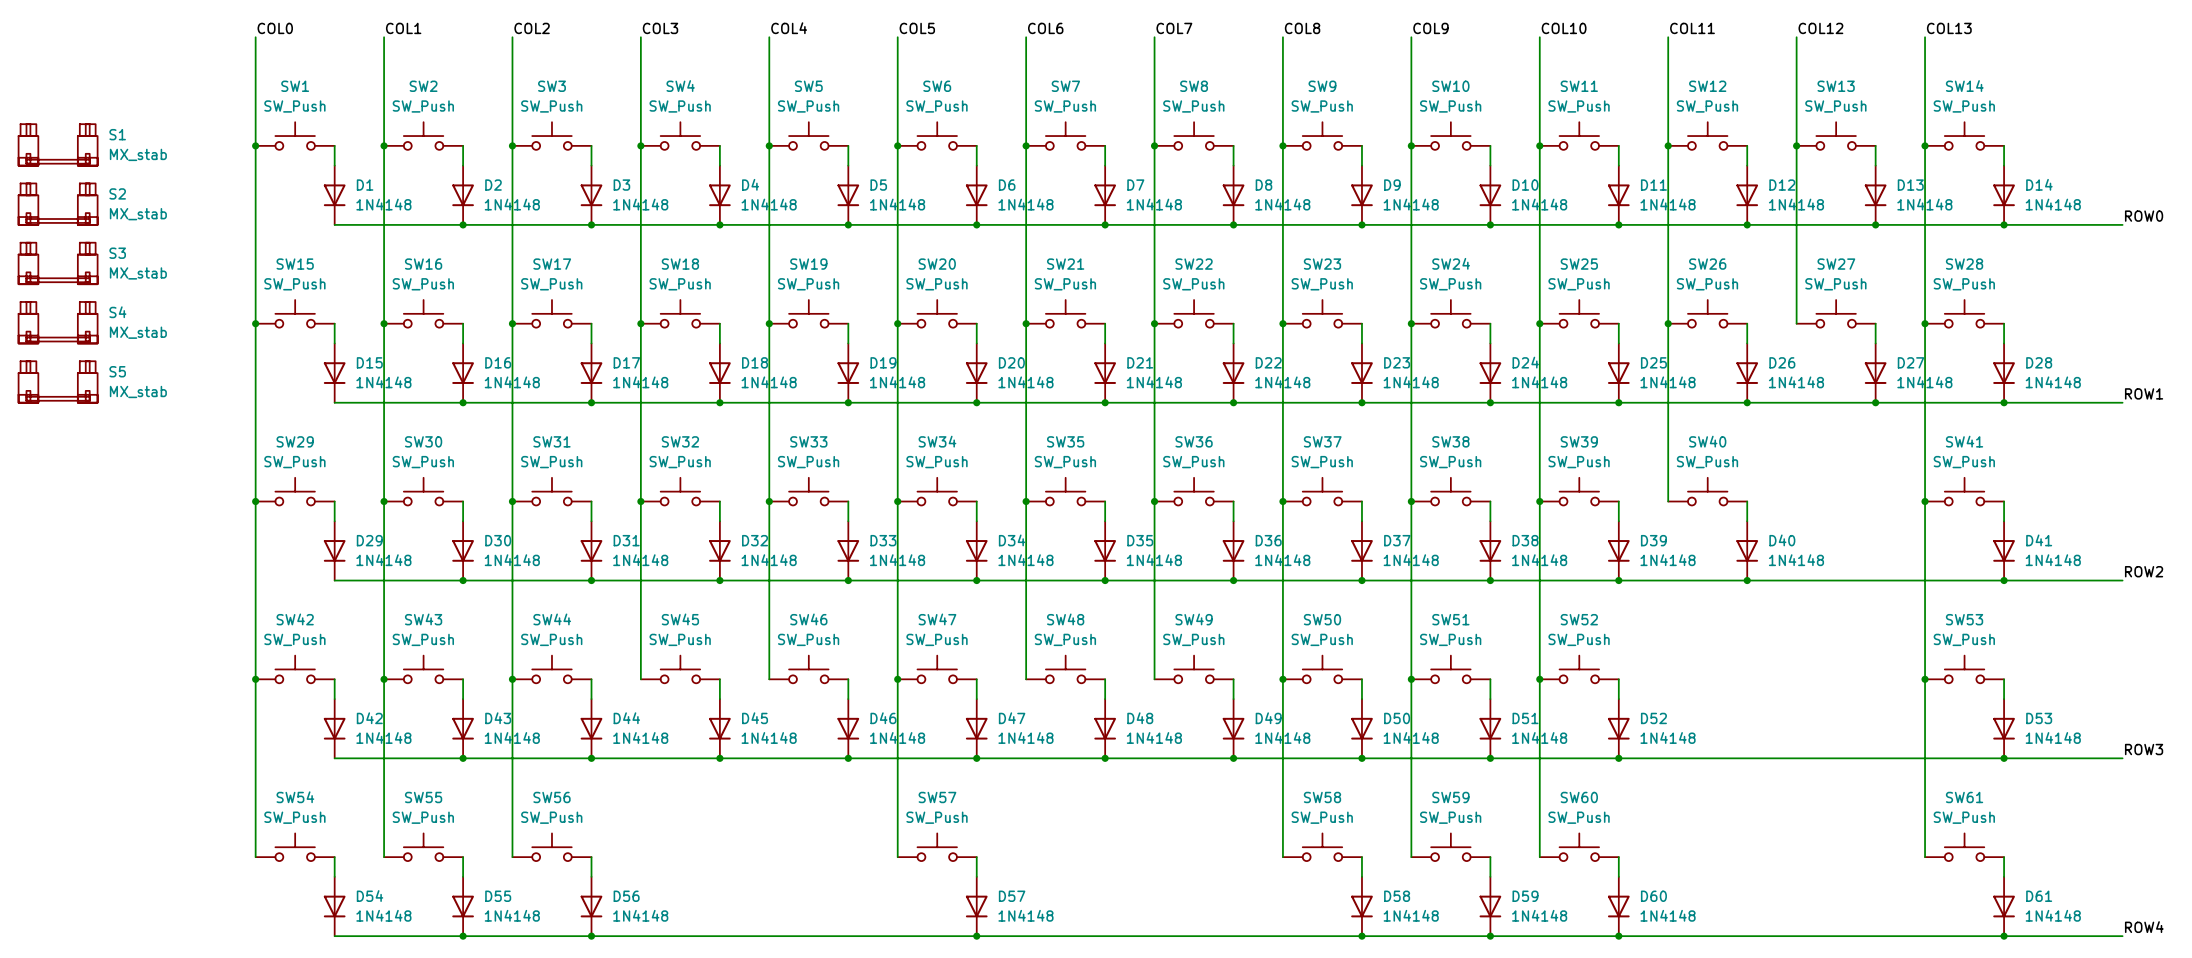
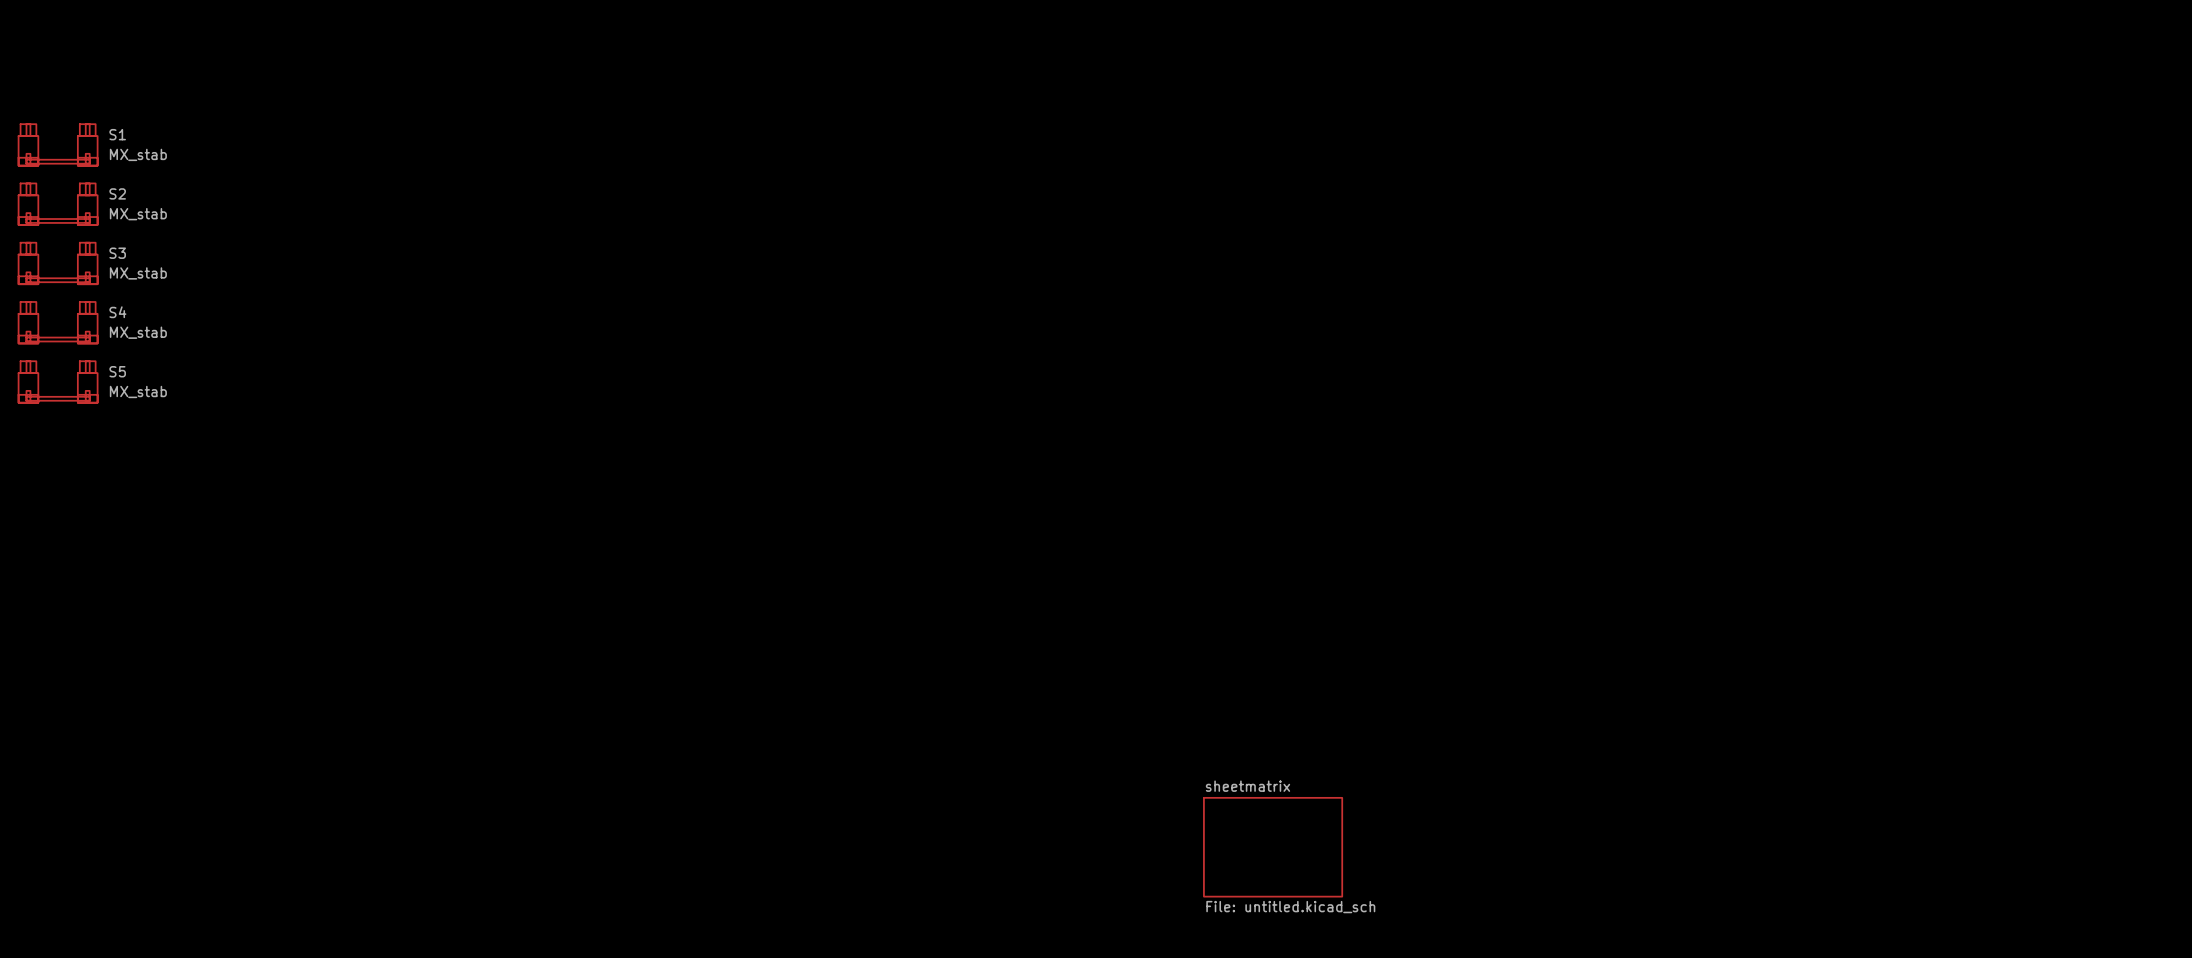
label: COL0 (275, 28) -> none
label: COL1 (403, 28) -> none
label: COL2 (532, 28) -> none
label: COL3 (660, 28) -> none
label: COL4 (789, 28) -> none
label: COL5 (917, 28) -> none
label: COL6 (1045, 28) -> none
label: COL7 (1174, 28) -> none
label: COL8 (1302, 28) -> none
label: COL9 (1430, 28) -> none
label: COL10 (1564, 28) -> none
label: COL11 (1692, 28) -> none
label: COL12 (1820, 28) -> none
label: COL13 (1949, 28) -> none
wire: (255, 37) (255, 857) -> none
wire: (384, 37) (384, 857) -> none
wire: (512, 37) (512, 857) -> none
wire: (640, 37) (640, 679) -> none
wire: (769, 37) (769, 679) -> none
wire: (897, 37) (897, 857) -> none
wire: (1026, 37) (1026, 679) -> none
wire: (1154, 37) (1154, 679) -> none
wire: (1282, 37) (1282, 857) -> none
wire: (1411, 37) (1411, 857) -> none
wire: (1539, 37) (1539, 857) -> none
wire: (1668, 37) (1668, 501) -> none
wire: (1796, 37) (1796, 323) -> none
wire: (1925, 37) (1925, 857) -> none
SW1: SW_Push (295, 136) -> none
SW2: SW_Push (423, 136) -> none
SW3: SW_Push (551, 136) -> none
SW4: SW_Push (680, 136) -> none
SW5: SW_Push (808, 136) -> none
SW6: SW_Push (937, 136) -> none
SW7: SW_Push (1065, 136) -> none
SW8: SW_Push (1194, 136) -> none
SW9: SW_Push (1322, 136) -> none
SW10: SW_Push (1450, 136) -> none
SW11: SW_Push (1579, 136) -> none
SW12: SW_Push (1707, 136) -> none
SW13: SW_Push (1836, 136) -> none
SW14: SW_Push (1964, 136) -> none
junction: (255, 145) -> none
wire: (334, 145) (334, 165) -> none
junction: (384, 145) -> none
wire: (463, 145) (463, 165) -> none
junction: (512, 145) -> none
wire: (591, 145) (591, 165) -> none
junction: (640, 145) -> none
wire: (719, 145) (719, 165) -> none
junction: (769, 145) -> none
wire: (848, 145) (848, 165) -> none
junction: (897, 145) -> none
wire: (976, 145) (976, 165) -> none
junction: (1026, 145) -> none
wire: (1105, 145) (1105, 165) -> none
junction: (1154, 145) -> none
wire: (1233, 145) (1233, 165) -> none
junction: (1282, 145) -> none
wire: (1361, 145) (1361, 165) -> none
junction: (1411, 145) -> none
wire: (1490, 145) (1490, 165) -> none
junction: (1539, 145) -> none
wire: (1618, 145) (1618, 165) -> none
junction: (1668, 145) -> none
wire: (1747, 145) (1747, 165) -> none
junction: (1796, 145) -> none
wire: (1875, 145) (1875, 165) -> none
junction: (1925, 145) -> none
wire: (2004, 145) (2004, 165) -> none
D1: 1N4148 (334, 195) -> none
D2: 1N4148 (463, 195) -> none
D3: 1N4148 (591, 195) -> none
D4: 1N4148 (719, 195) -> none
D5: 1N4148 (848, 195) -> none
D6: 1N4148 (976, 195) -> none
D7: 1N4148 (1105, 195) -> none
D8: 1N4148 (1233, 195) -> none
D9: 1N4148 (1361, 195) -> none
D10: 1N4148 (1490, 195) -> none
D11: 1N4148 (1618, 195) -> none
D12: 1N4148 (1747, 195) -> none
D13: 1N4148 (1875, 195) -> none
D14: 1N4148 (2004, 195) -> none
label: ROW0 (2144, 216) -> none
wire: (334, 224) (2122, 224) -> none
junction: (463, 224) -> none
junction: (591, 224) -> none
junction: (719, 224) -> none
junction: (848, 224) -> none
junction: (976, 224) -> none
junction: (1105, 224) -> none
junction: (1233, 224) -> none
junction: (1361, 224) -> none
junction: (1490, 224) -> none
junction: (1618, 224) -> none
junction: (1747, 224) -> none
junction: (1875, 224) -> none
junction: (2004, 224) -> none
SW15: SW_Push (295, 313) -> none
SW16: SW_Push (423, 313) -> none
SW17: SW_Push (551, 313) -> none
SW18: SW_Push (680, 313) -> none
SW19: SW_Push (808, 313) -> none
SW20: SW_Push (937, 313) -> none
SW21: SW_Push (1065, 313) -> none
SW22: SW_Push (1194, 313) -> none
SW23: SW_Push (1322, 313) -> none
SW24: SW_Push (1450, 313) -> none
SW25: SW_Push (1579, 313) -> none
SW26: SW_Push (1707, 313) -> none
SW27: SW_Push (1836, 313) -> none
SW28: SW_Push (1964, 313) -> none
junction: (255, 323) -> none
wire: (334, 323) (334, 343) -> none
junction: (384, 323) -> none
wire: (463, 323) (463, 343) -> none
junction: (512, 323) -> none
wire: (591, 323) (591, 343) -> none
junction: (640, 323) -> none
wire: (719, 323) (719, 343) -> none
junction: (769, 323) -> none
wire: (848, 323) (848, 343) -> none
junction: (897, 323) -> none
wire: (976, 323) (976, 343) -> none
junction: (1026, 323) -> none
wire: (1105, 323) (1105, 343) -> none
junction: (1154, 323) -> none
wire: (1233, 323) (1233, 343) -> none
junction: (1282, 323) -> none
wire: (1361, 323) (1361, 343) -> none
junction: (1411, 323) -> none
wire: (1490, 323) (1490, 343) -> none
junction: (1539, 323) -> none
wire: (1618, 323) (1618, 343) -> none
junction: (1668, 323) -> none
wire: (1747, 323) (1747, 343) -> none
wire: (1875, 323) (1875, 343) -> none
junction: (1925, 323) -> none
wire: (2004, 323) (2004, 343) -> none
D15: 1N4148 (334, 373) -> none
D16: 1N4148 (463, 373) -> none
D17: 1N4148 (591, 373) -> none
D18: 1N4148 (719, 373) -> none
D19: 1N4148 (848, 373) -> none
D20: 1N4148 (976, 373) -> none
D21: 1N4148 (1105, 373) -> none
D22: 1N4148 (1233, 373) -> none
D23: 1N4148 (1361, 373) -> none
D24: 1N4148 (1490, 373) -> none
D25: 1N4148 (1618, 373) -> none
D26: 1N4148 (1747, 373) -> none
D27: 1N4148 (1875, 373) -> none
D28: 1N4148 (2004, 373) -> none
label: ROW1 (2144, 393) -> none
wire: (334, 402) (2122, 402) -> none
junction: (463, 402) -> none
junction: (591, 402) -> none
junction: (719, 402) -> none
junction: (848, 402) -> none
junction: (976, 402) -> none
junction: (1105, 402) -> none
junction: (1233, 402) -> none
junction: (1361, 402) -> none
junction: (1490, 402) -> none
junction: (1618, 402) -> none
junction: (1747, 402) -> none
junction: (1875, 402) -> none
junction: (2004, 402) -> none
SW29: SW_Push (295, 491) -> none
SW30: SW_Push (423, 491) -> none
SW31: SW_Push (551, 491) -> none
SW32: SW_Push (680, 491) -> none
SW33: SW_Push (808, 491) -> none
SW34: SW_Push (937, 491) -> none
SW35: SW_Push (1065, 491) -> none
SW36: SW_Push (1194, 491) -> none
SW37: SW_Push (1322, 491) -> none
SW38: SW_Push (1450, 491) -> none
SW39: SW_Push (1579, 491) -> none
SW40: SW_Push (1707, 491) -> none
SW41: SW_Push (1964, 491) -> none
junction: (255, 501) -> none
wire: (334, 501) (334, 521) -> none
junction: (384, 501) -> none
wire: (463, 501) (463, 521) -> none
junction: (512, 501) -> none
wire: (591, 501) (591, 521) -> none
junction: (640, 501) -> none
wire: (719, 501) (719, 521) -> none
junction: (769, 501) -> none
wire: (848, 501) (848, 521) -> none
junction: (897, 501) -> none
wire: (976, 501) (976, 521) -> none
junction: (1026, 501) -> none
wire: (1105, 501) (1105, 521) -> none
junction: (1154, 501) -> none
wire: (1233, 501) (1233, 521) -> none
junction: (1282, 501) -> none
wire: (1361, 501) (1361, 521) -> none
junction: (1411, 501) -> none
wire: (1490, 501) (1490, 521) -> none
junction: (1539, 501) -> none
wire: (1618, 501) (1618, 521) -> none
wire: (1747, 501) (1747, 521) -> none
junction: (1925, 501) -> none
wire: (2004, 501) (2004, 521) -> none
D29: 1N4148 (334, 550) -> none
D30: 1N4148 (463, 550) -> none
D31: 1N4148 (591, 550) -> none
D32: 1N4148 (719, 550) -> none
D33: 1N4148 (848, 550) -> none
D34: 1N4148 (976, 550) -> none
D35: 1N4148 (1105, 550) -> none
D36: 1N4148 (1233, 550) -> none
D37: 1N4148 (1361, 550) -> none
D38: 1N4148 (1490, 550) -> none
D39: 1N4148 (1618, 550) -> none
D40: 1N4148 (1747, 550) -> none
D41: 1N4148 (2004, 550) -> none
label: ROW2 (2144, 571) -> none
wire: (334, 580) (2122, 580) -> none
junction: (463, 580) -> none
junction: (591, 580) -> none
junction: (719, 580) -> none
junction: (848, 580) -> none
junction: (976, 580) -> none
junction: (1105, 580) -> none
junction: (1233, 580) -> none
junction: (1361, 580) -> none
junction: (1490, 580) -> none
junction: (1618, 580) -> none
junction: (1747, 580) -> none
junction: (2004, 580) -> none
SW42: SW_Push (295, 669) -> none
SW43: SW_Push (423, 669) -> none
SW44: SW_Push (551, 669) -> none
SW45: SW_Push (680, 669) -> none
SW46: SW_Push (808, 669) -> none
SW47: SW_Push (937, 669) -> none
SW48: SW_Push (1065, 669) -> none
SW49: SW_Push (1194, 669) -> none
SW50: SW_Push (1322, 669) -> none
SW51: SW_Push (1450, 669) -> none
SW52: SW_Push (1579, 669) -> none
SW53: SW_Push (1964, 669) -> none
junction: (255, 679) -> none
wire: (334, 679) (334, 699) -> none
junction: (384, 679) -> none
wire: (463, 679) (463, 699) -> none
junction: (512, 679) -> none
wire: (591, 679) (591, 699) -> none
wire: (719, 679) (719, 699) -> none
wire: (848, 679) (848, 699) -> none
junction: (897, 679) -> none
wire: (976, 679) (976, 699) -> none
wire: (1105, 679) (1105, 699) -> none
wire: (1233, 679) (1233, 699) -> none
junction: (1282, 679) -> none
wire: (1361, 679) (1361, 699) -> none
junction: (1411, 679) -> none
wire: (1490, 679) (1490, 699) -> none
junction: (1539, 679) -> none
wire: (1618, 679) (1618, 699) -> none
junction: (1925, 679) -> none
wire: (2004, 679) (2004, 699) -> none
D42: 1N4148 (334, 728) -> none
D43: 1N4148 (463, 728) -> none
D44: 1N4148 (591, 728) -> none
D45: 1N4148 (719, 728) -> none
D46: 1N4148 (848, 728) -> none
D47: 1N4148 (976, 728) -> none
D48: 1N4148 (1105, 728) -> none
D49: 1N4148 (1233, 728) -> none
D50: 1N4148 (1361, 728) -> none
D51: 1N4148 (1490, 728) -> none
D52: 1N4148 (1618, 728) -> none
D53: 1N4148 (2004, 728) -> none
label: ROW3 (2144, 749) -> none
wire: (334, 758) (2122, 758) -> none
junction: (463, 758) -> none
junction: (591, 758) -> none
junction: (719, 758) -> none
junction: (848, 758) -> none
junction: (976, 758) -> none
junction: (1105, 758) -> none
junction: (1233, 758) -> none
junction: (1361, 758) -> none
junction: (1490, 758) -> none
junction: (1618, 758) -> none
junction: (2004, 758) -> none
SW54: SW_Push (295, 847) -> none
SW55: SW_Push (423, 847) -> none
SW56: SW_Push (551, 847) -> none
SW57: SW_Push (937, 847) -> none
sheet sheetmatrix: none -> File: untitled.kicad_sch (1273, 847)
SW58: SW_Push (1322, 847) -> none
SW59: SW_Push (1450, 847) -> none
SW60: SW_Push (1579, 847) -> none
SW61: SW_Push (1964, 847) -> none
wire: (334, 857) (334, 876) -> none
wire: (463, 857) (463, 876) -> none
wire: (591, 857) (591, 876) -> none
wire: (976, 857) (976, 876) -> none
wire: (1361, 857) (1361, 876) -> none
wire: (1490, 857) (1490, 876) -> none
wire: (1618, 857) (1618, 876) -> none
wire: (2004, 857) (2004, 876) -> none
D54: 1N4148 (334, 906) -> none
D55: 1N4148 (463, 906) -> none
D56: 1N4148 (591, 906) -> none
D57: 1N4148 (976, 906) -> none
D58: 1N4148 (1361, 906) -> none
D59: 1N4148 (1490, 906) -> none
D60: 1N4148 (1618, 906) -> none
D61: 1N4148 (2004, 906) -> none
label: ROW4 (2144, 927) -> none
wire: (334, 936) (2122, 936) -> none
junction: (463, 936) -> none
junction: (591, 936) -> none
junction: (976, 936) -> none
junction: (1361, 936) -> none
junction: (1490, 936) -> none
junction: (1618, 936) -> none
junction: (2004, 936) -> none

